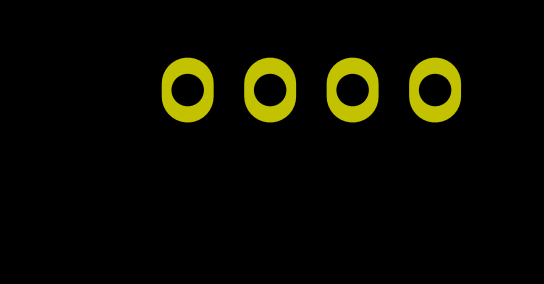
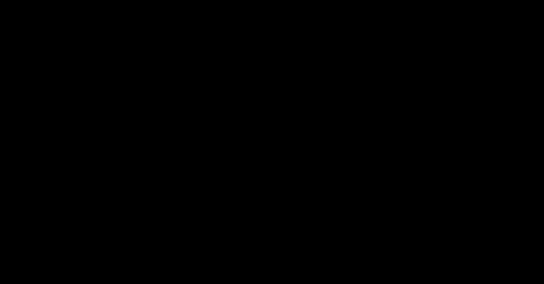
part: (311, 90) -> none

